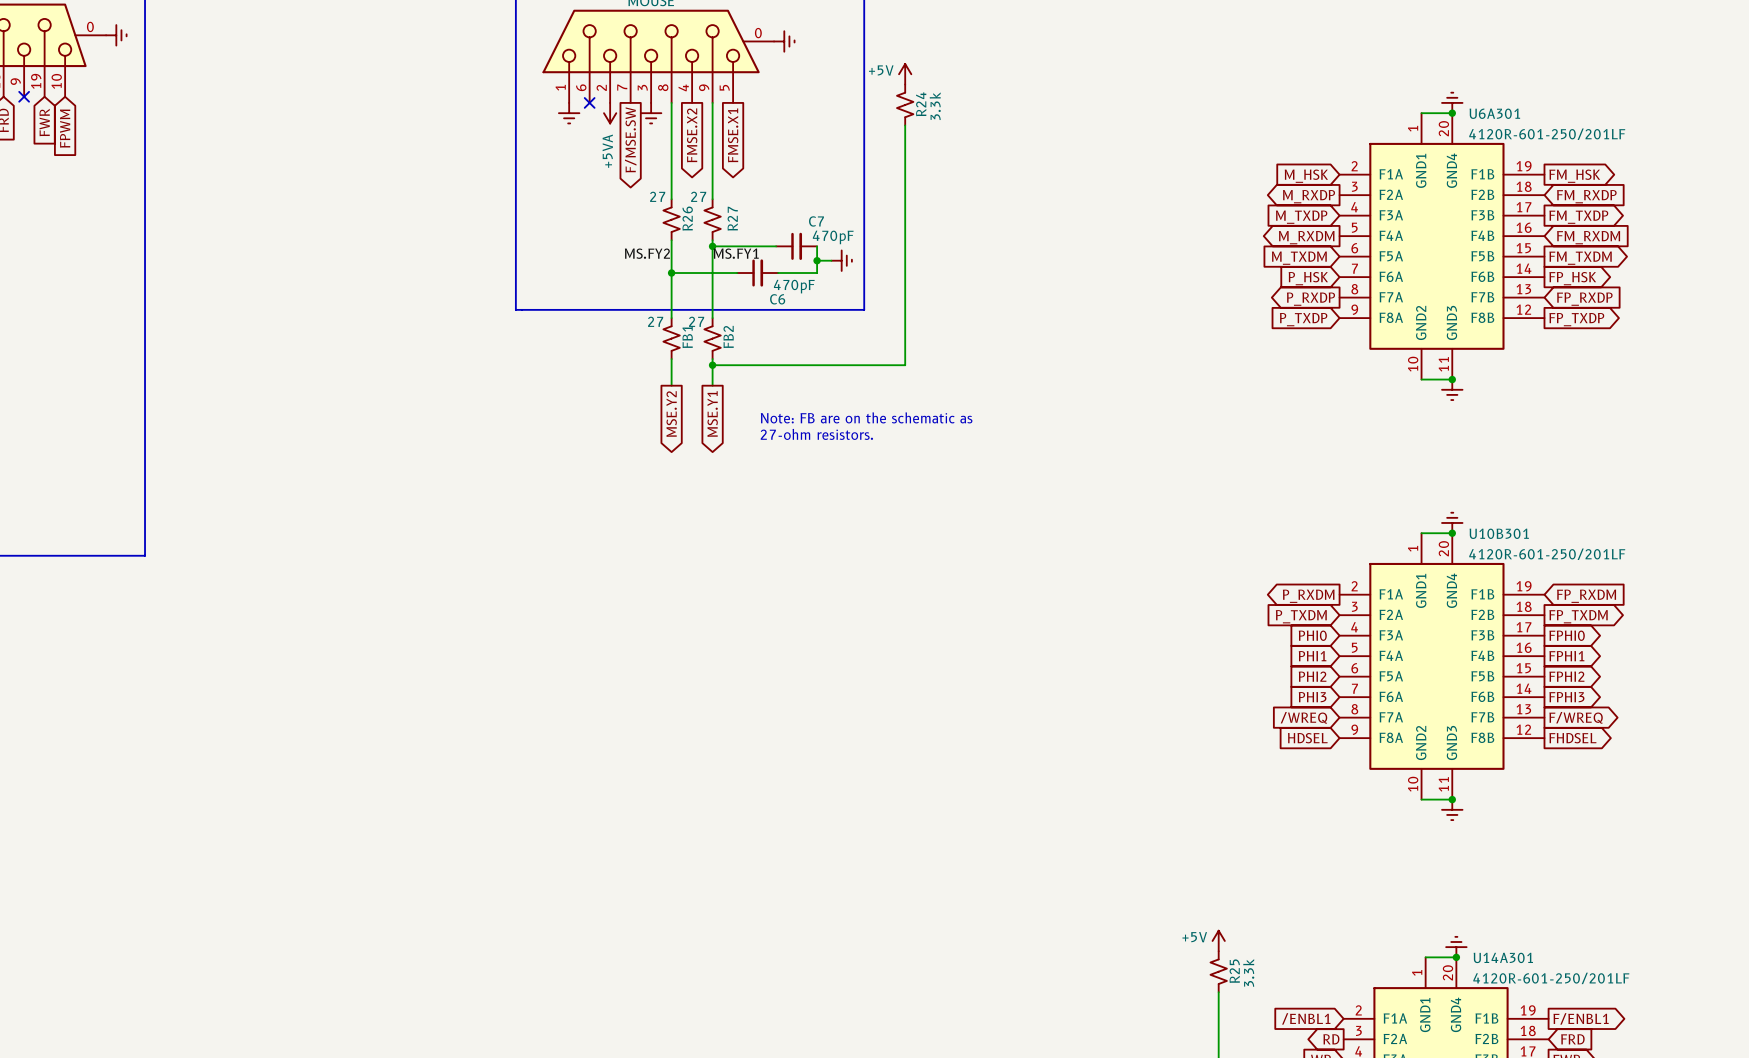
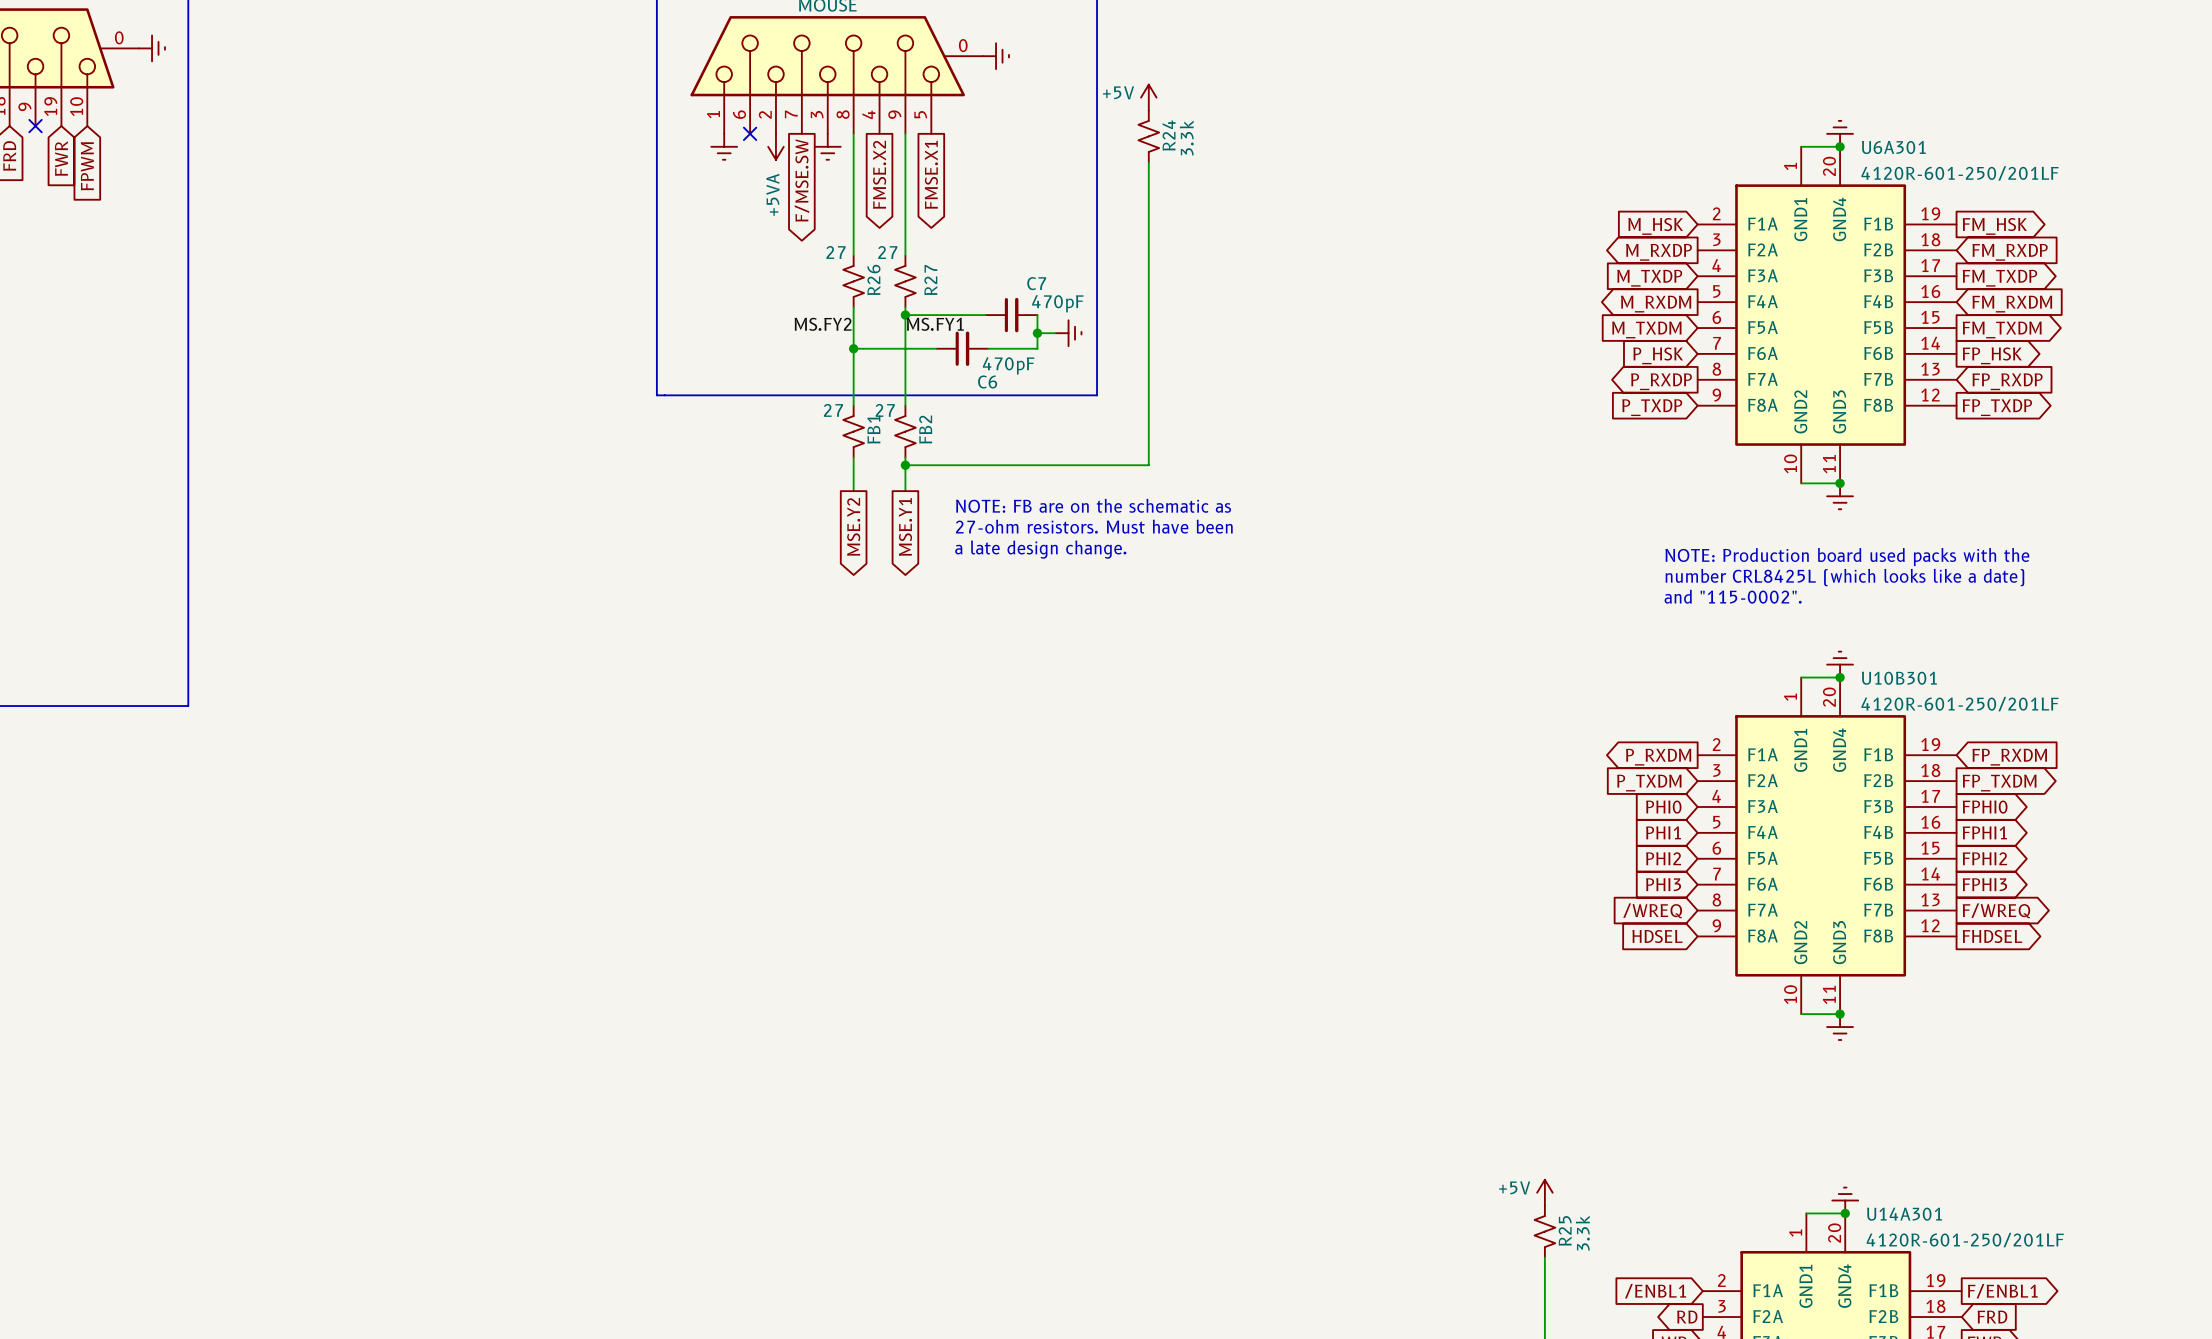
text: Note: FB are on the schematic as (866, 417) -> NOTE: FB are on the schematic as (1093, 505)
text: none -> a late design change. (1040, 549)
text: 27-ohm resistors. (816, 434) -> 27-ohm resistors. Must have been (1094, 526)
text: none -> NOTE: Production board used packs with the (1847, 557)
text: none -> number CRL8425L (which looks like a date) (1844, 577)
text: none -> and "115-0002". (1733, 596)

